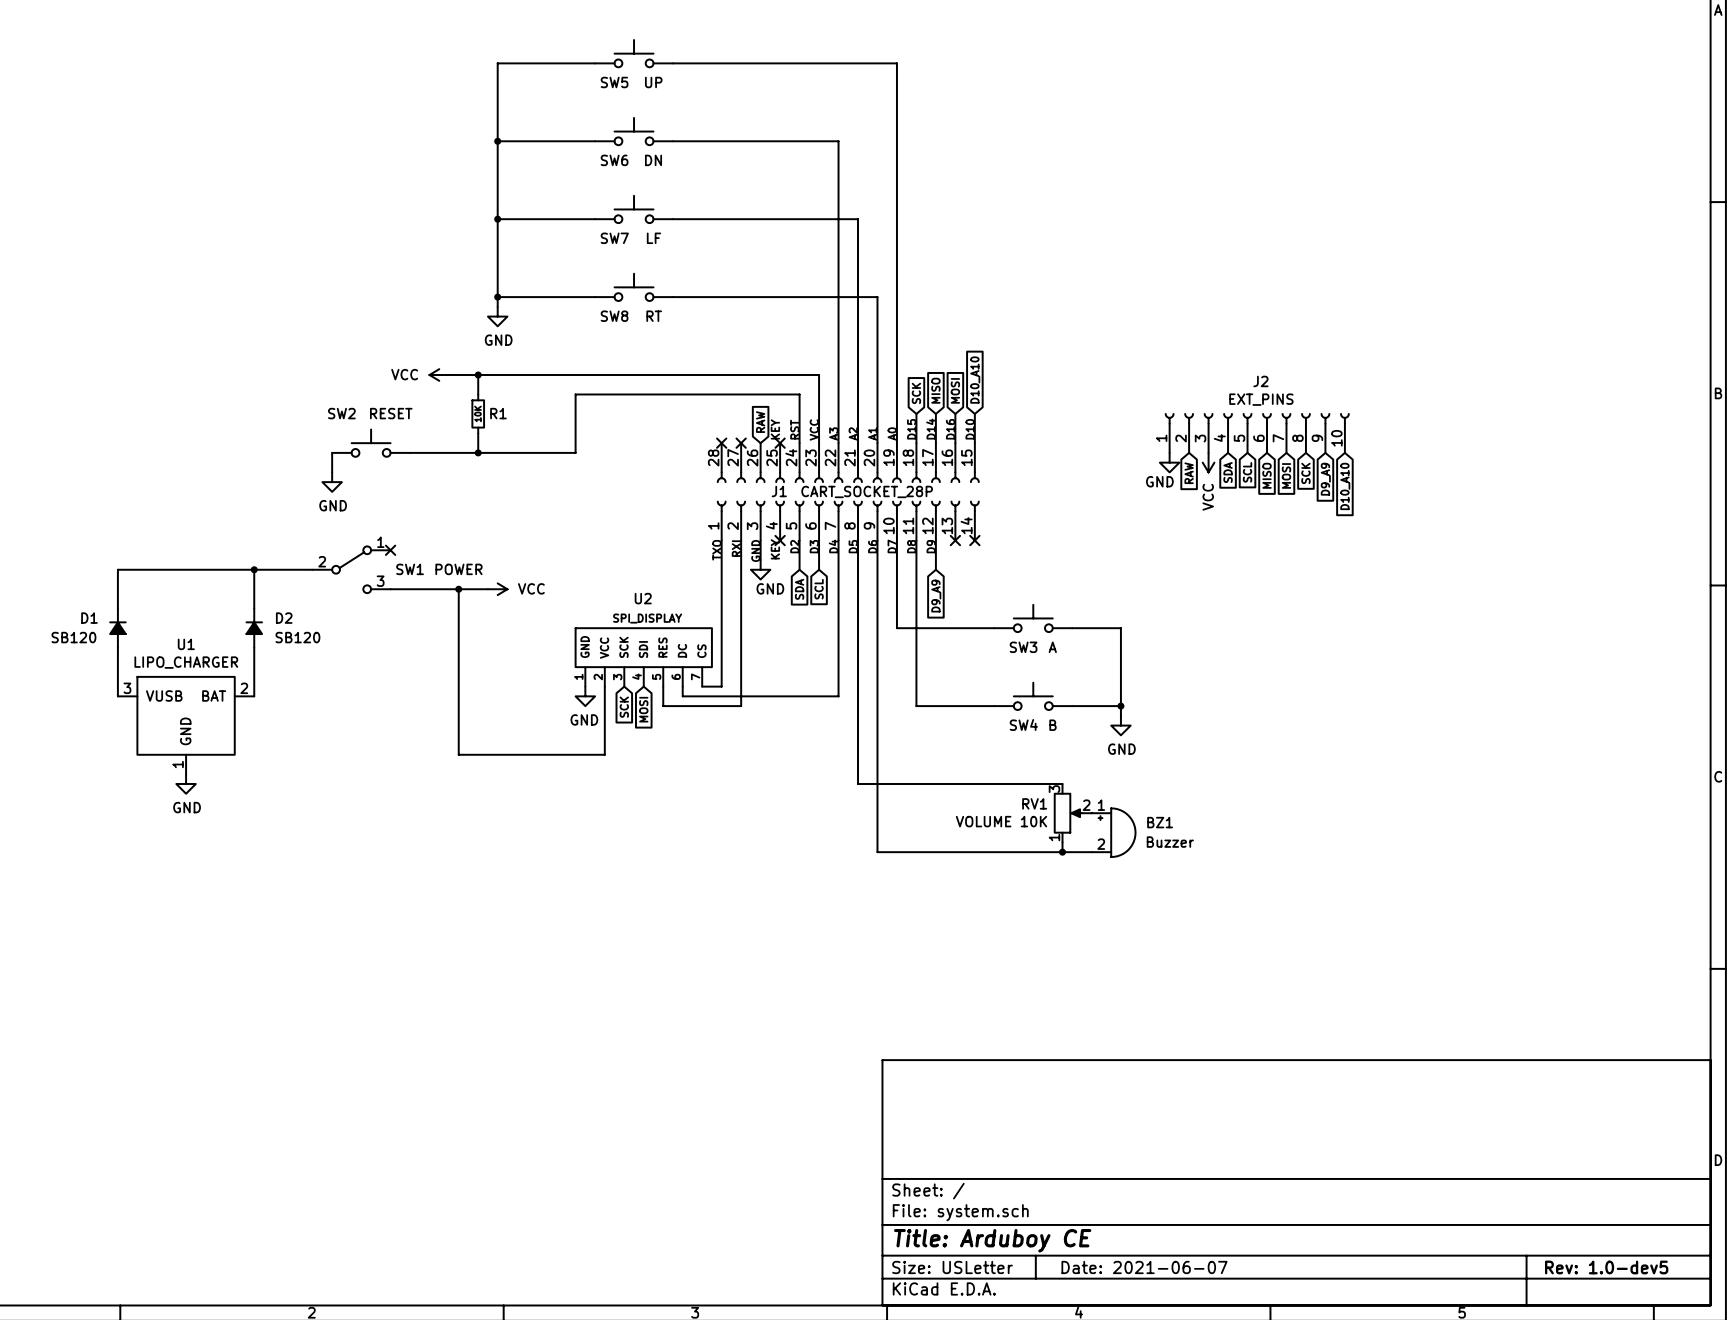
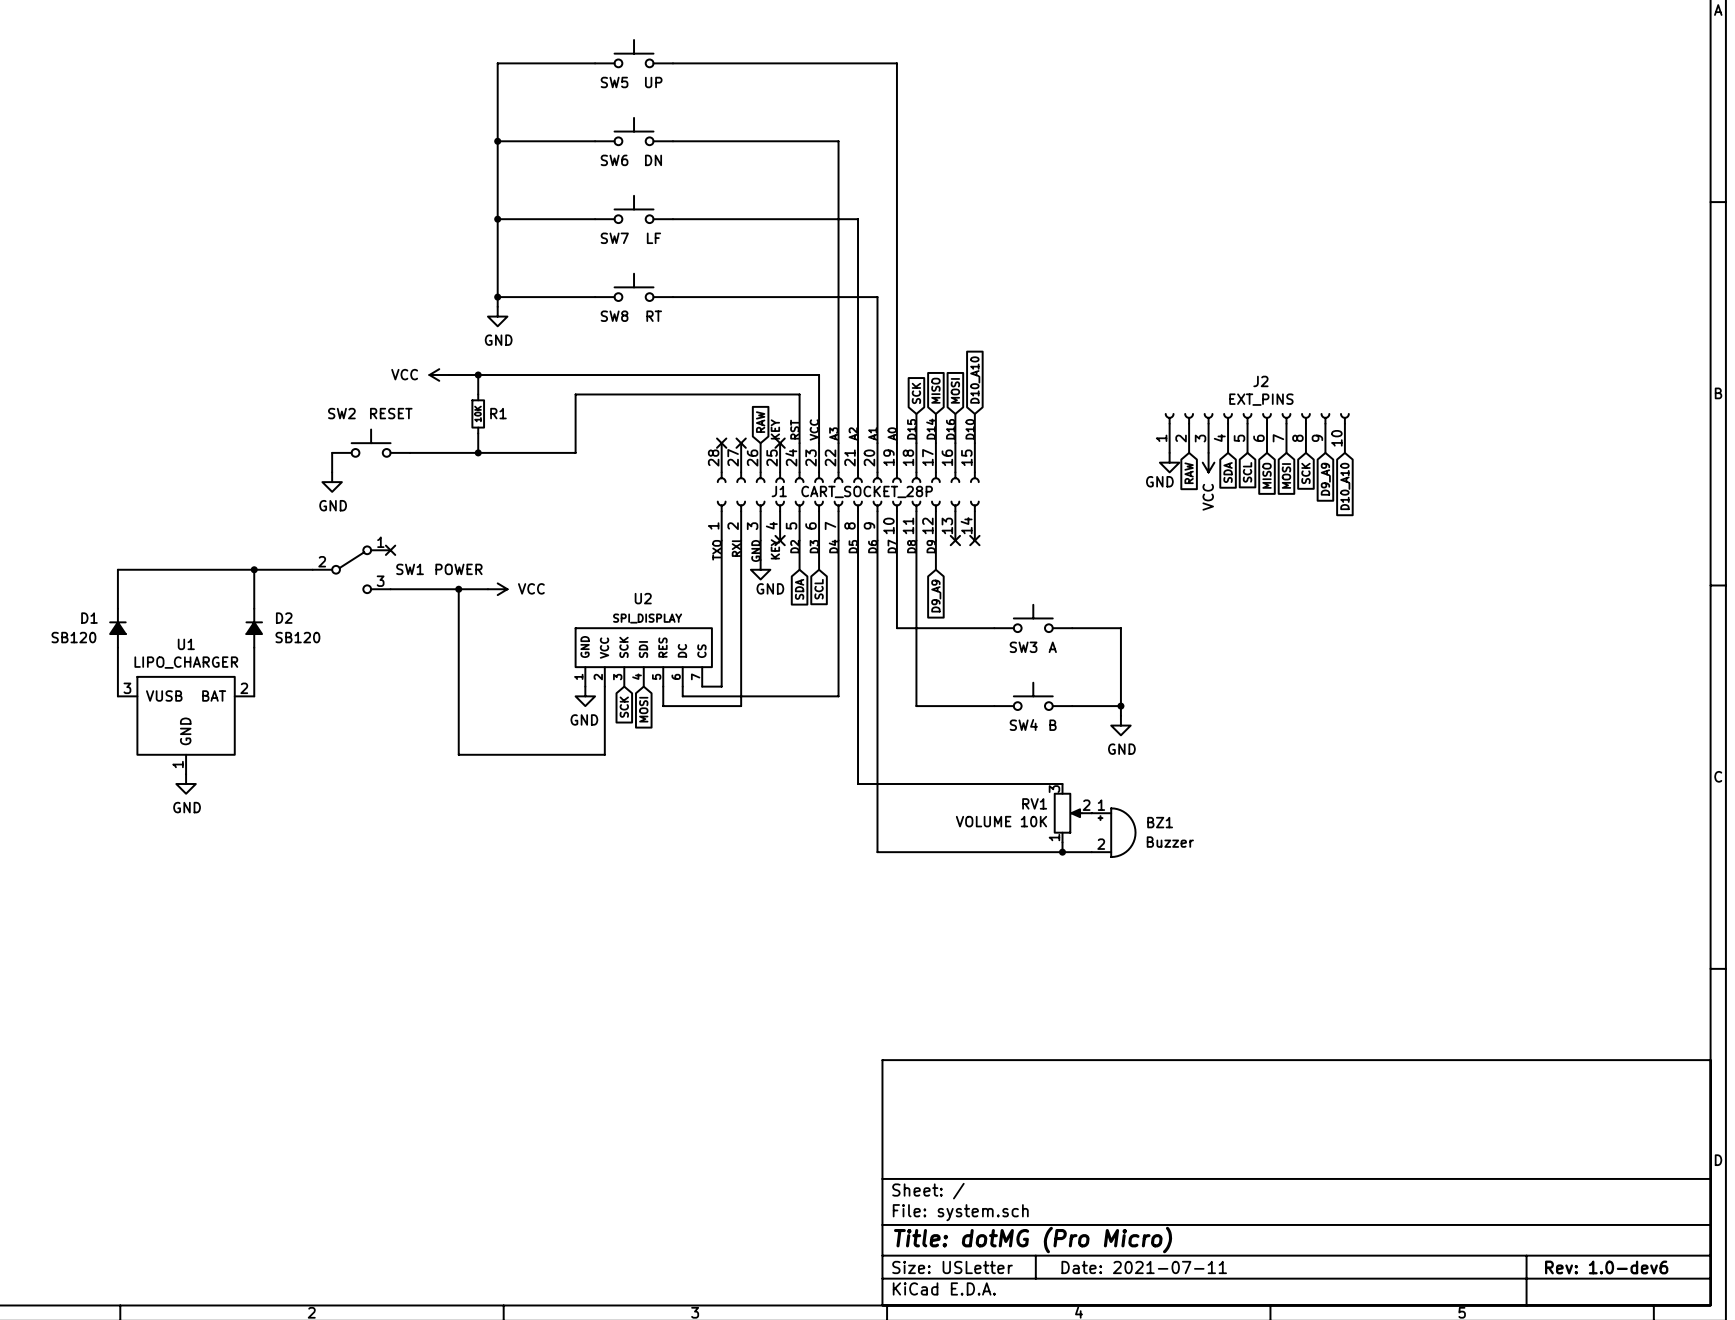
title block: Title: Arduboy CE (992, 1240) -> Title: dotMG (Pro Micro) (1033, 1240)
title block: Date: 2021-06-07 (1144, 1267) -> Date: 2021-07-11 (1144, 1267)
title block: Rev: 1.0-dev5 (1606, 1267) -> Rev: 1.0-dev6 (1606, 1267)

